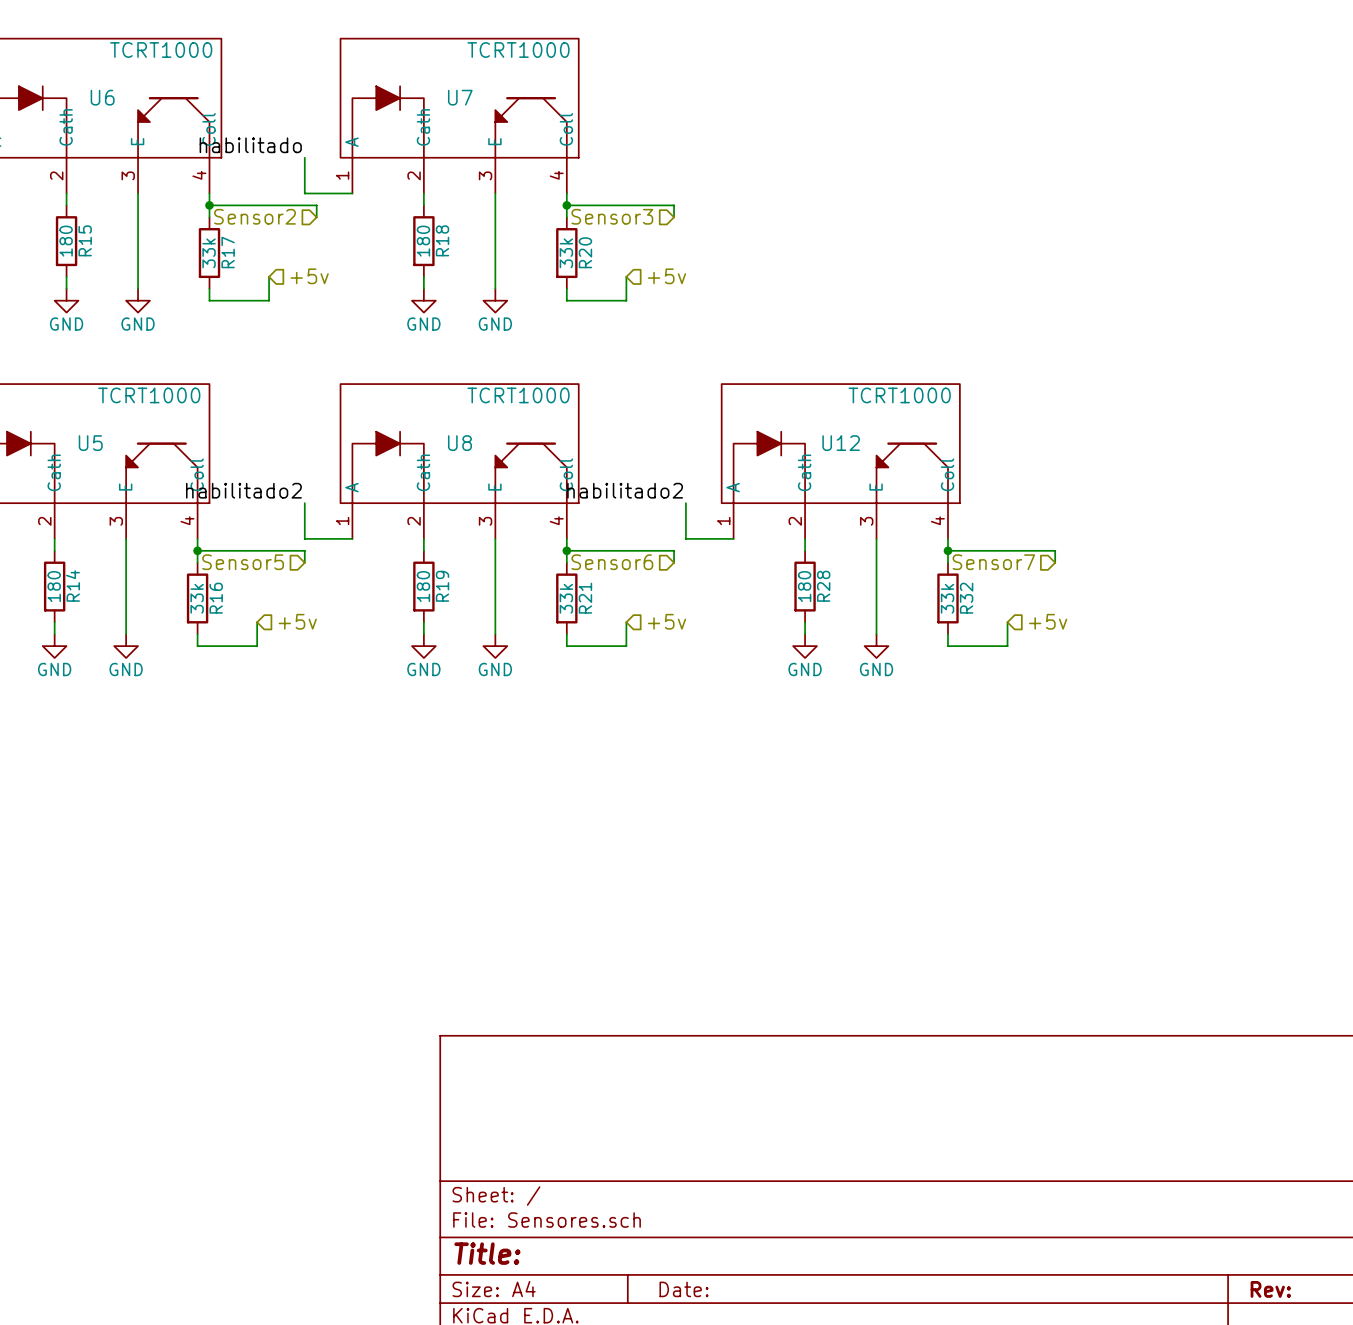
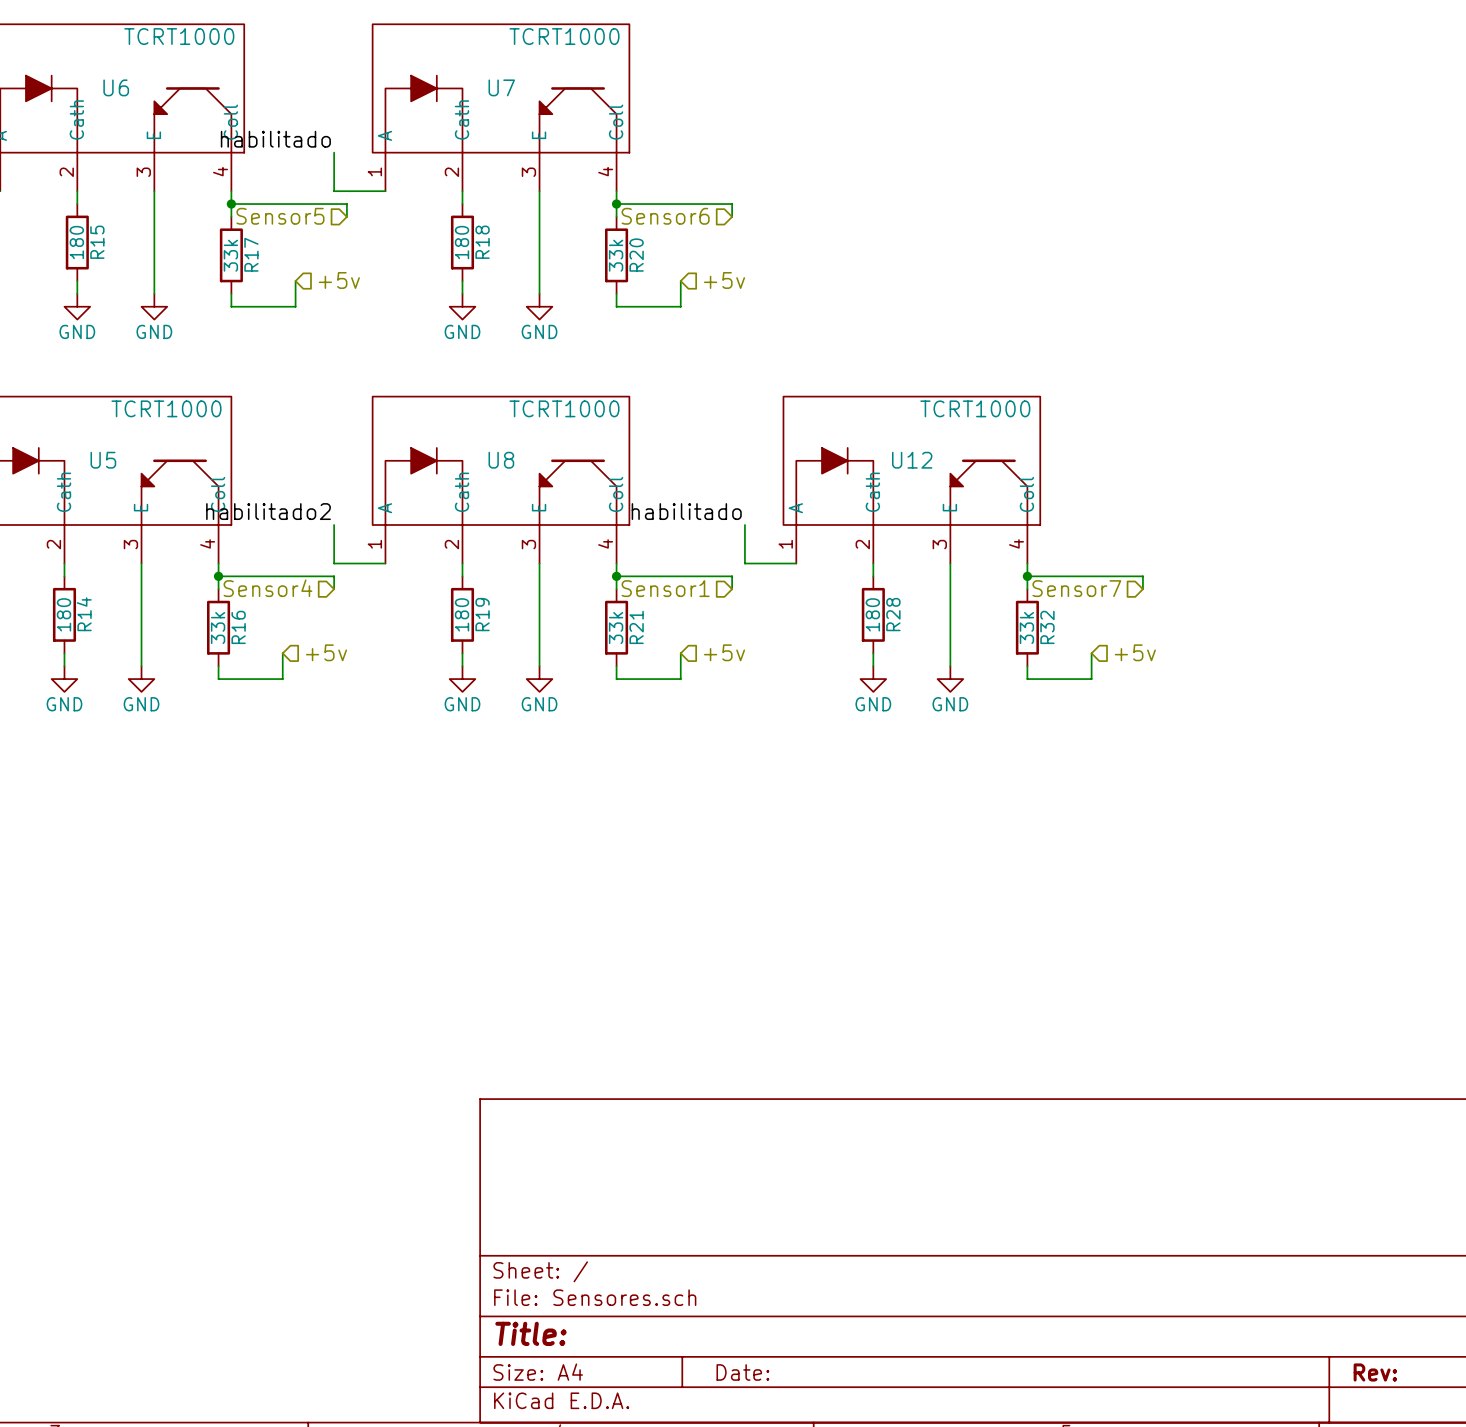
hierarchical label: Sensor2 (255, 216) -> Sensor5 (280, 216)
hierarchical label: Sensor3 (612, 216) -> Sensor6 (665, 216)
label: habilitado2 (625, 490) -> habilitado (686, 511)
hierarchical label: Sensor5 (243, 562) -> Sensor4 (267, 588)
hierarchical label: Sensor6 (612, 562) -> Sensor1 (665, 588)

